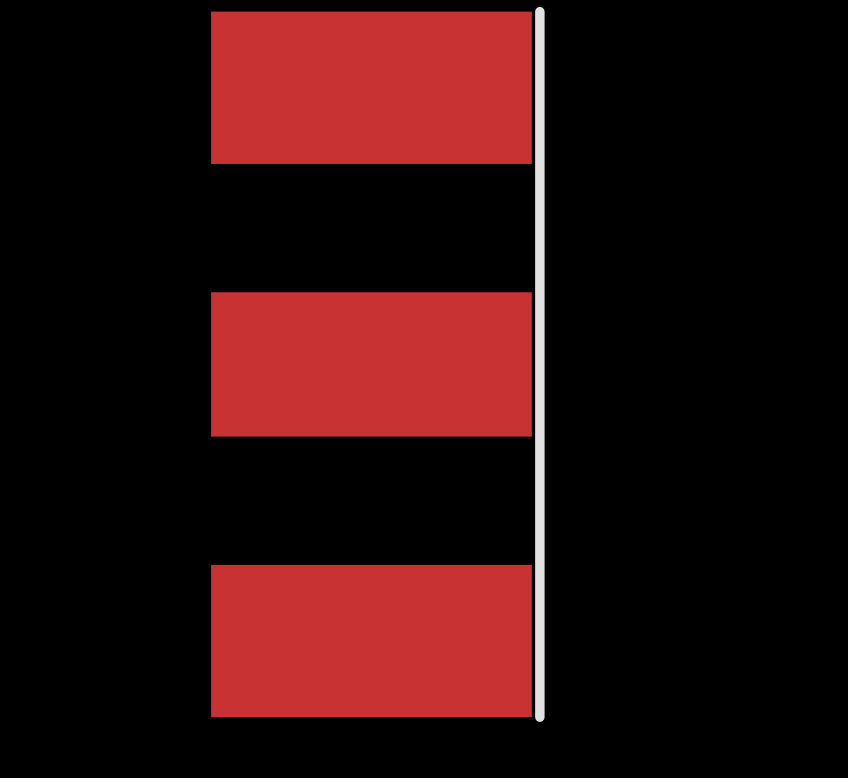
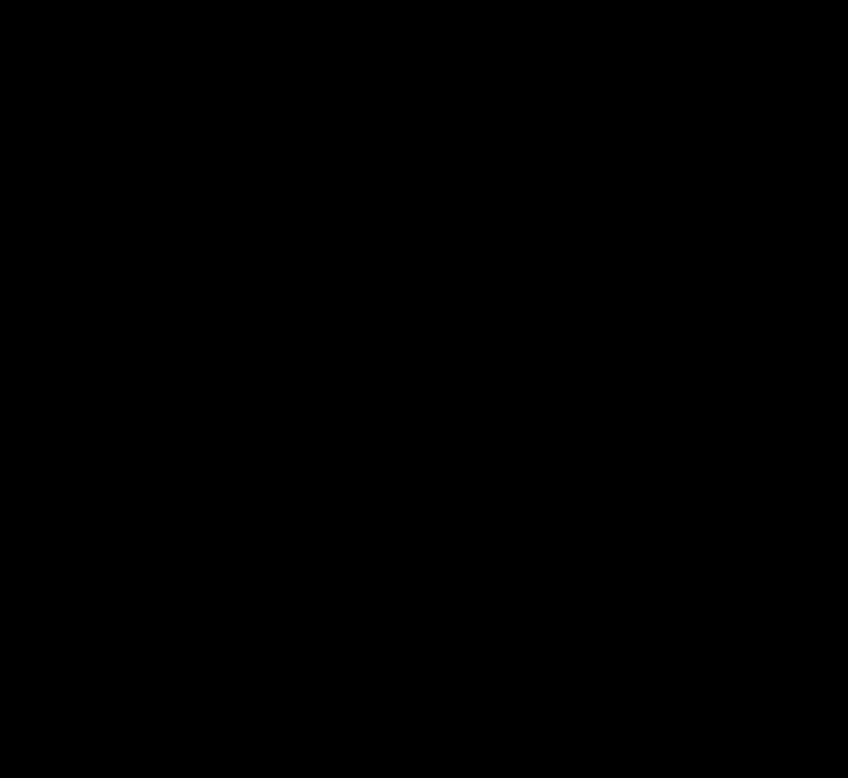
part: (377, 364) -> none

